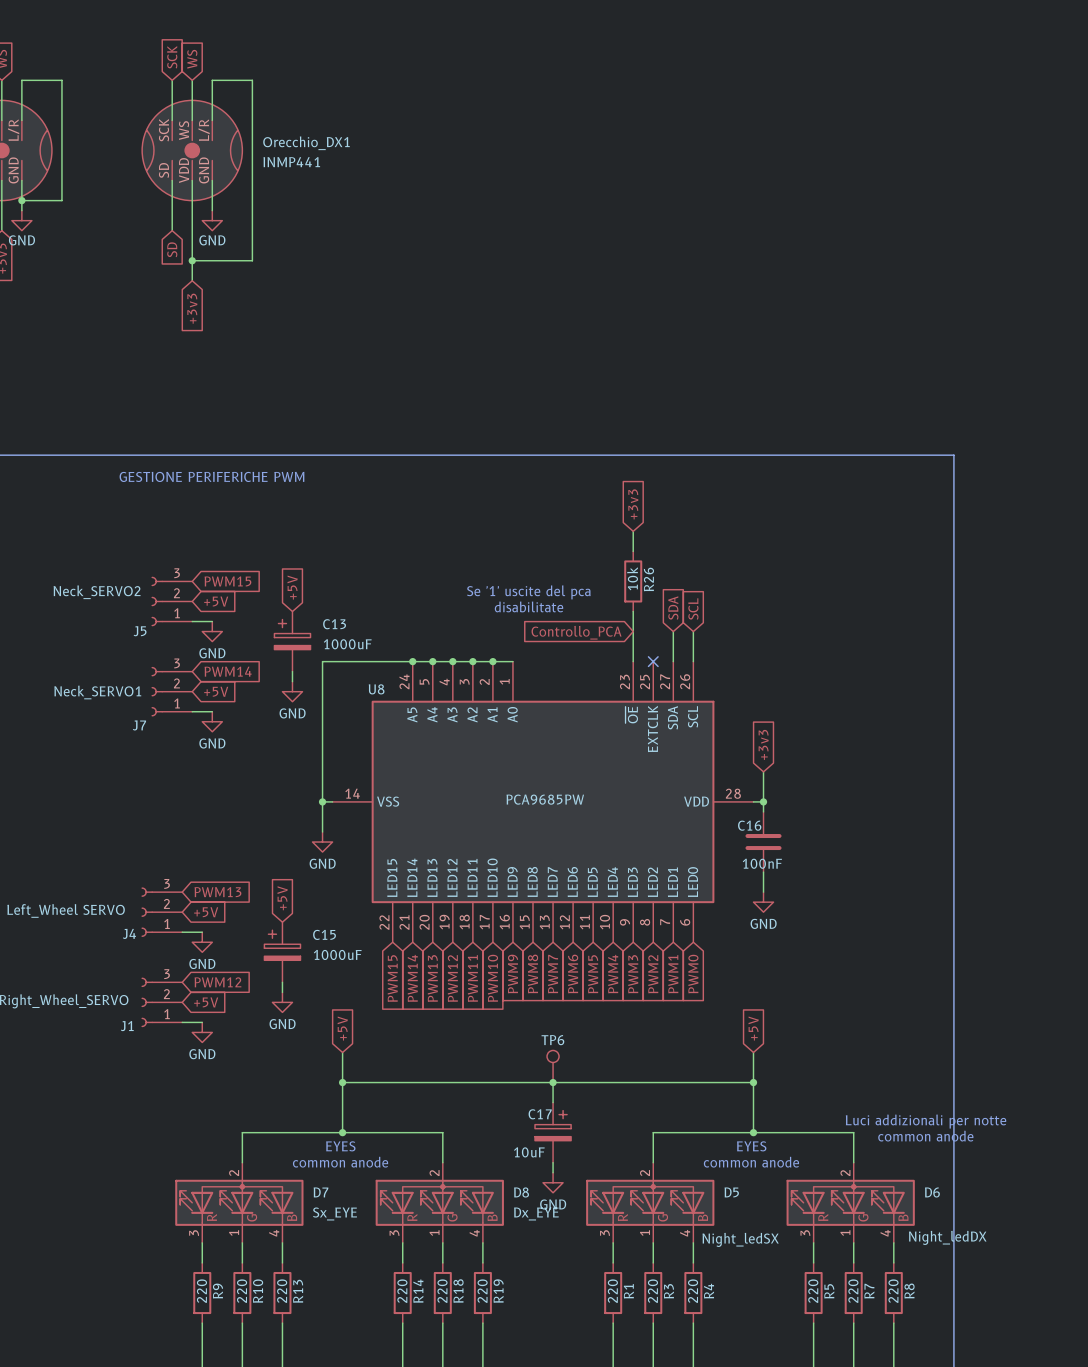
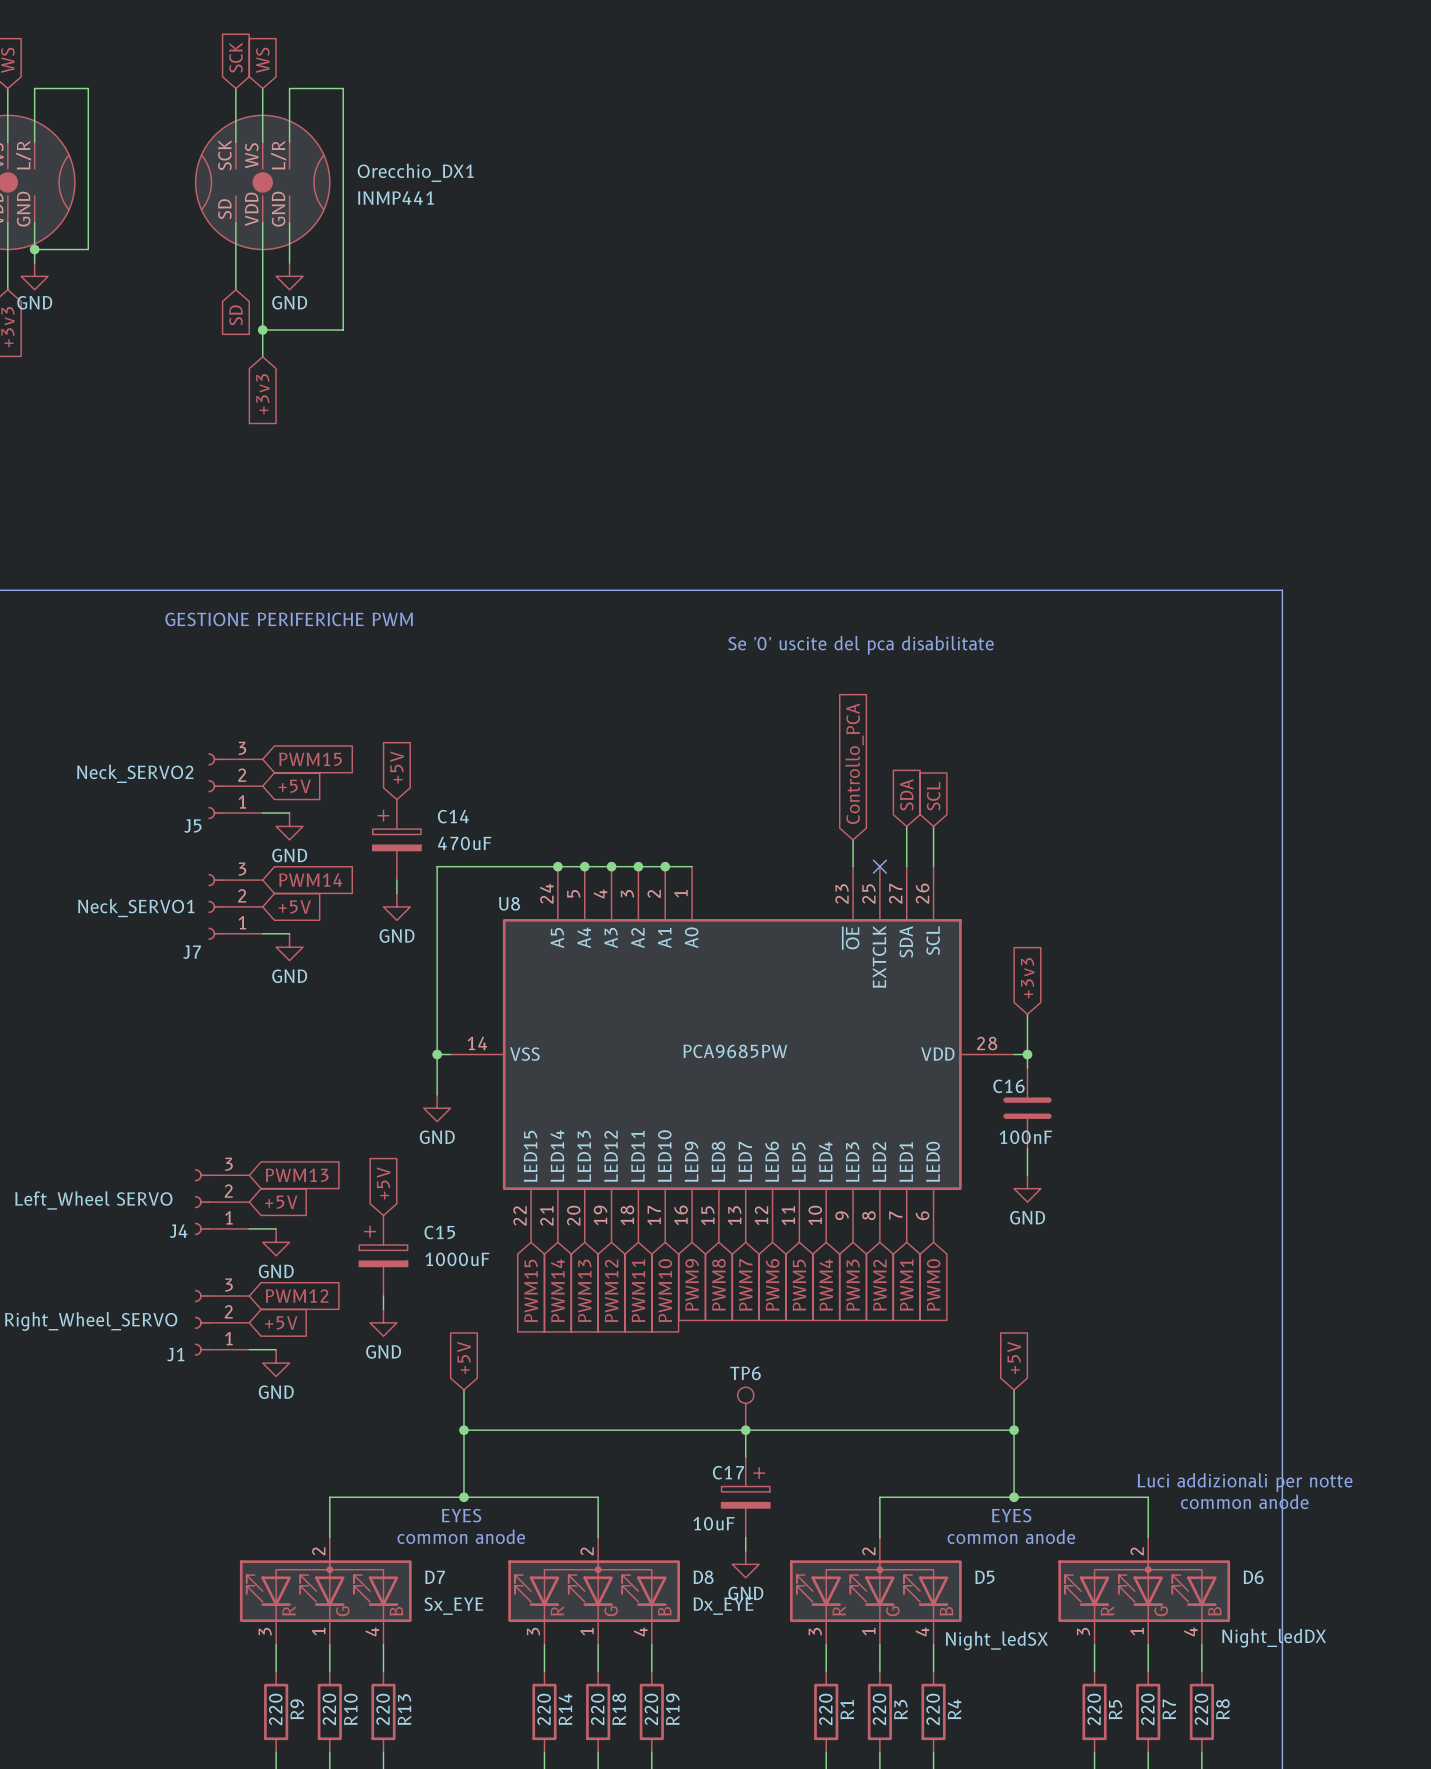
text: none -> Se '0' uscite del pca disabilitate (860, 645)
global label: +3v3 (633, 504) -> none
wire: (633, 531) (633, 551) -> none
R26: 10k (633, 581) -> none
text: Se '1' uscite del pca (528, 592) -> none
text: disabilitate (529, 606) -> none
wire: (633, 611) (633, 641) -> none
C13 name: C13 (334, 624) -> C14 (453, 816)
global label rotation: 0° (576, 632) -> 90° clockwise (854, 763)
C13 value: 1000uF (347, 644) -> 470uF (464, 843)

